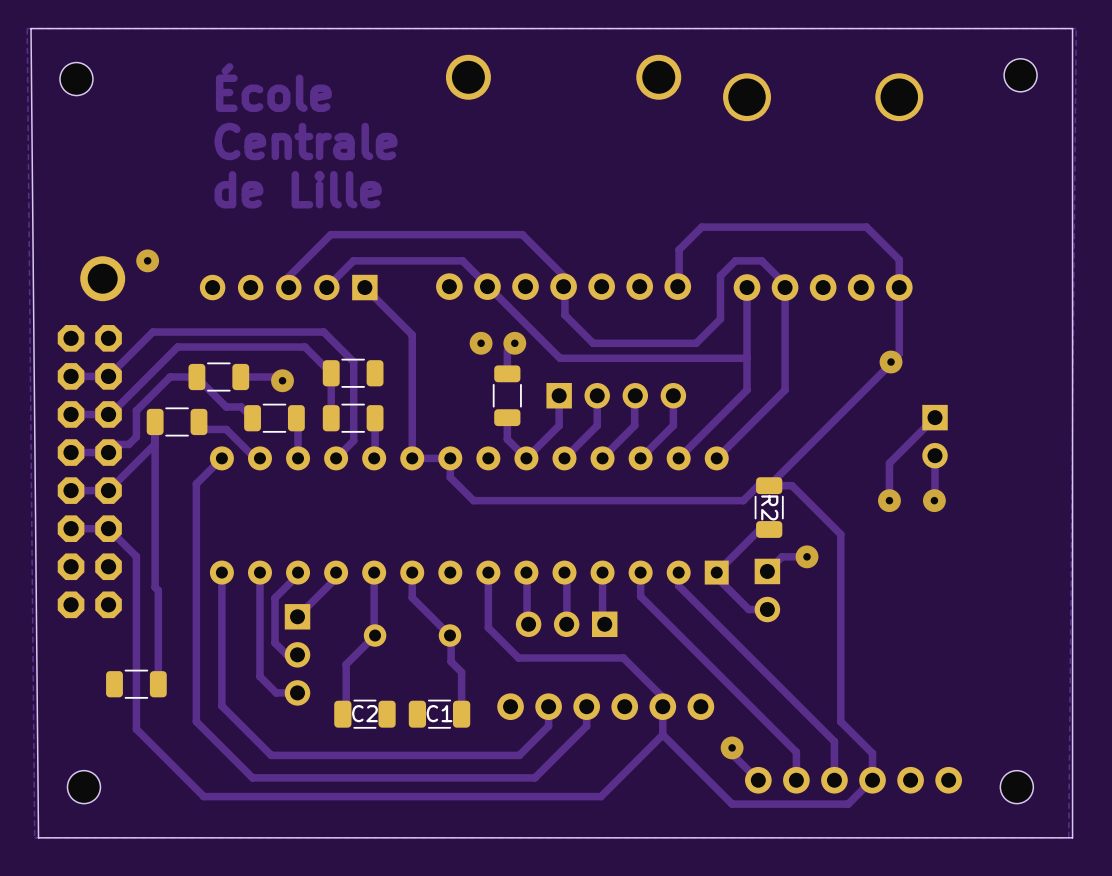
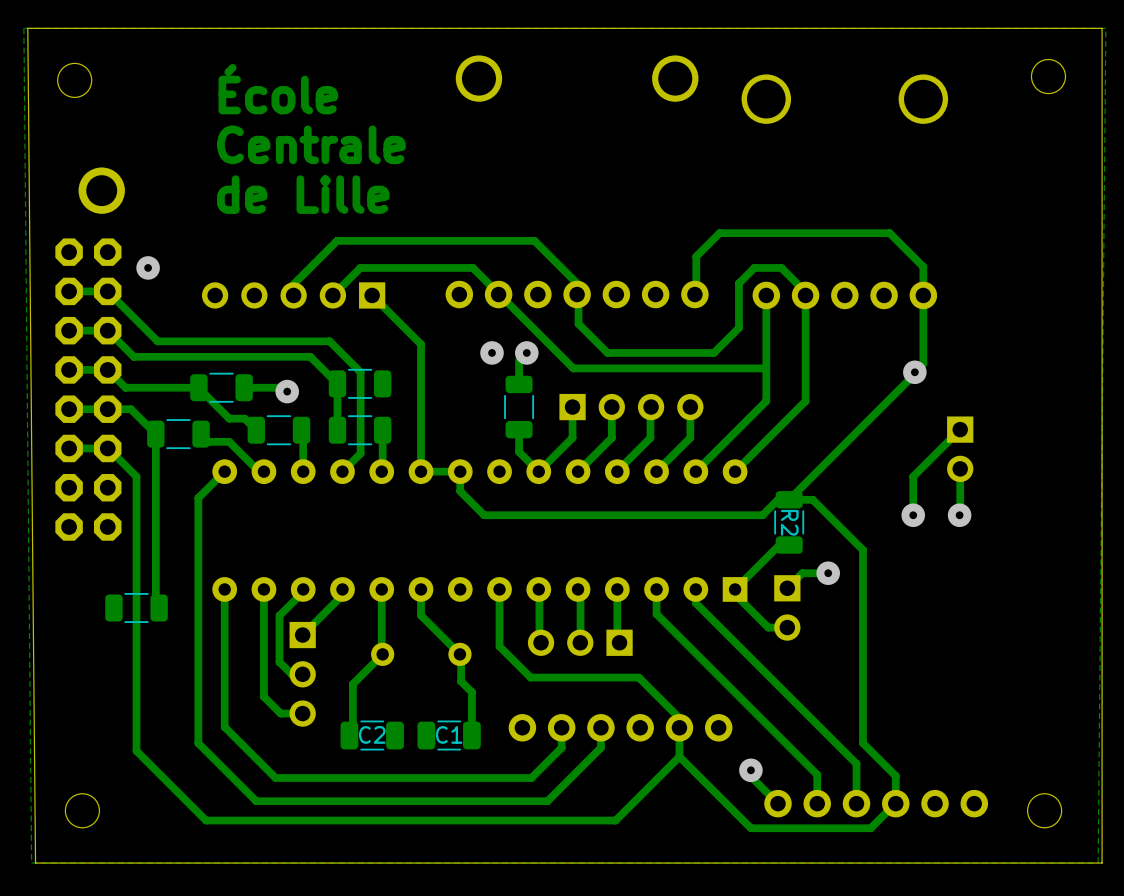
track: (156, 332) (152, 332) (108, 376) (71, 376) -> (157, 341) (107, 291) (69, 291)
track: (177, 347) (110, 414) (71, 414) -> (179, 356) (133, 356) (107, 330) (69, 330)
track: (170, 377) (136, 410) (136, 436) (128, 444) (116, 444) (108, 452) (71, 452) -> (171, 387) (125, 387) (107, 369) (69, 369)
track: none -> (69, 409) (130, 409) (155, 434)
part position: (91, 437) -> (90, 354)
track: (155, 443) (108, 490) (71, 490) -> none
track: (71, 528) (108, 528) (136, 556) -> (69, 448) (108, 448) (136, 476) (136, 572)
track: (158, 590) (158, 684) -> none
part position: (136, 684) -> (136, 607)

